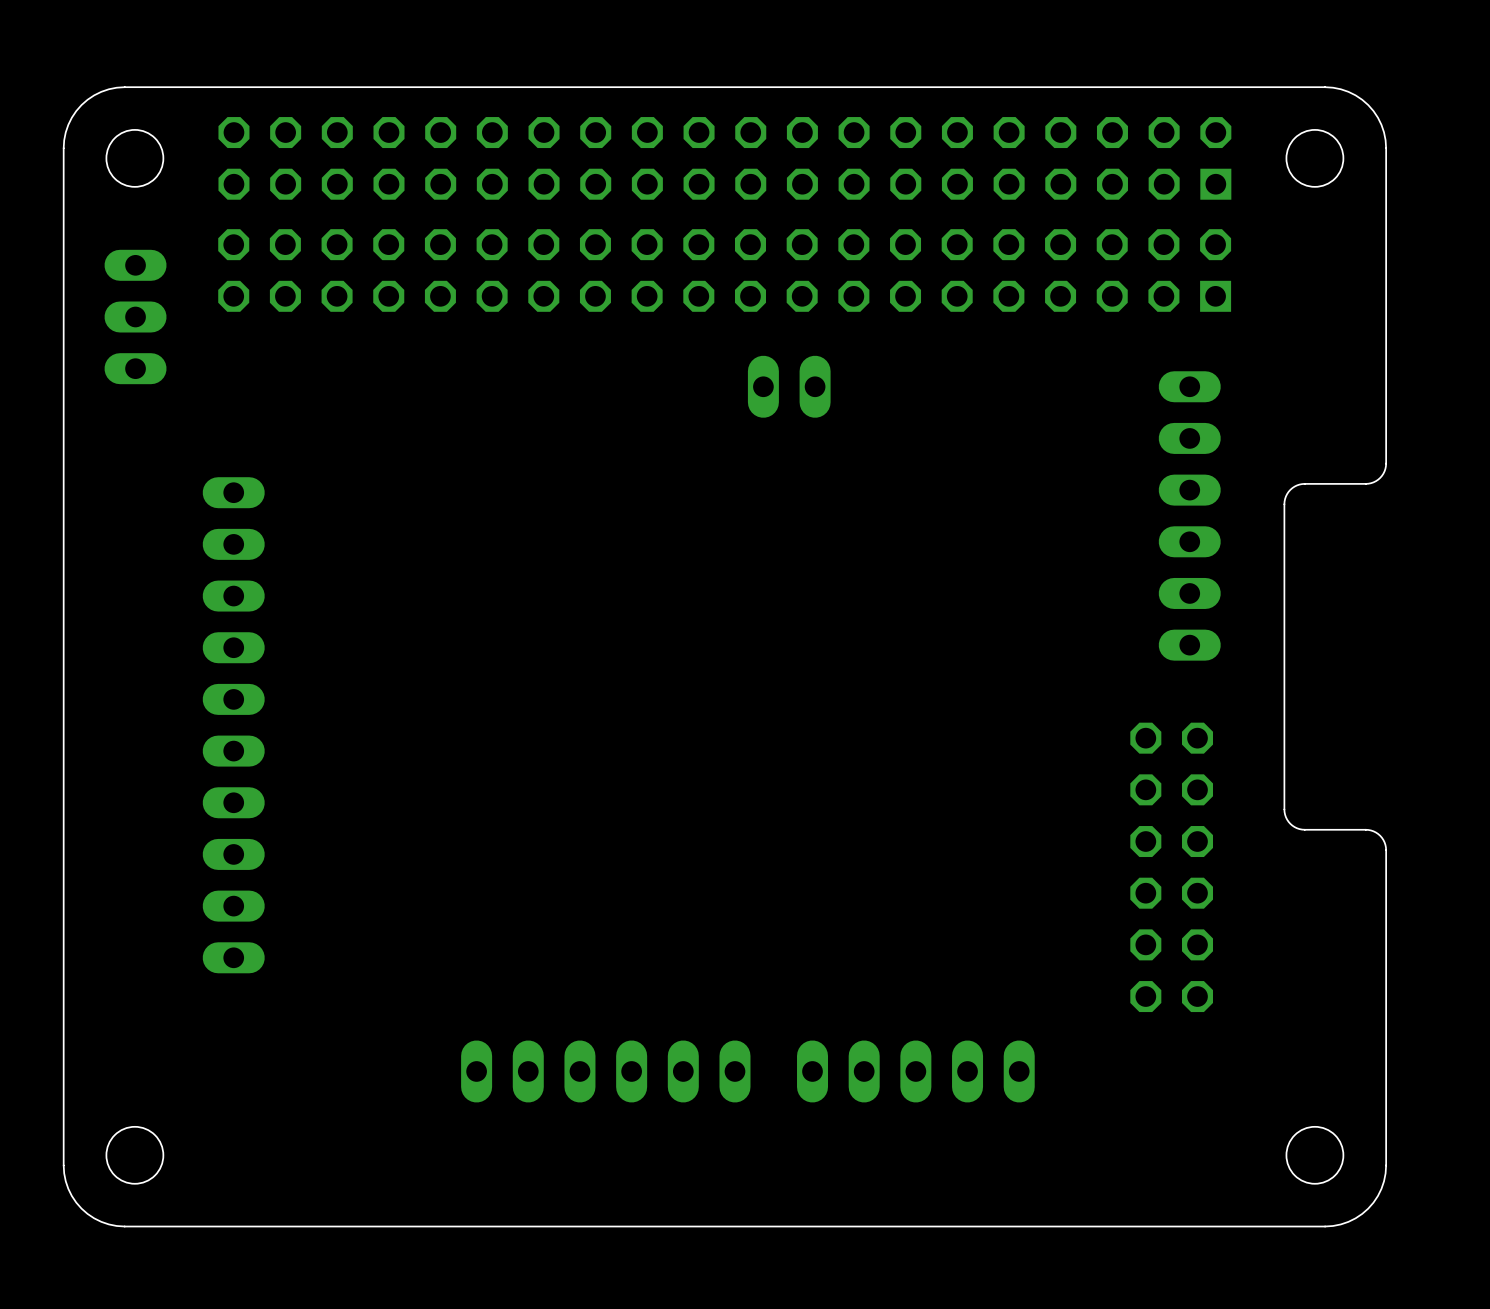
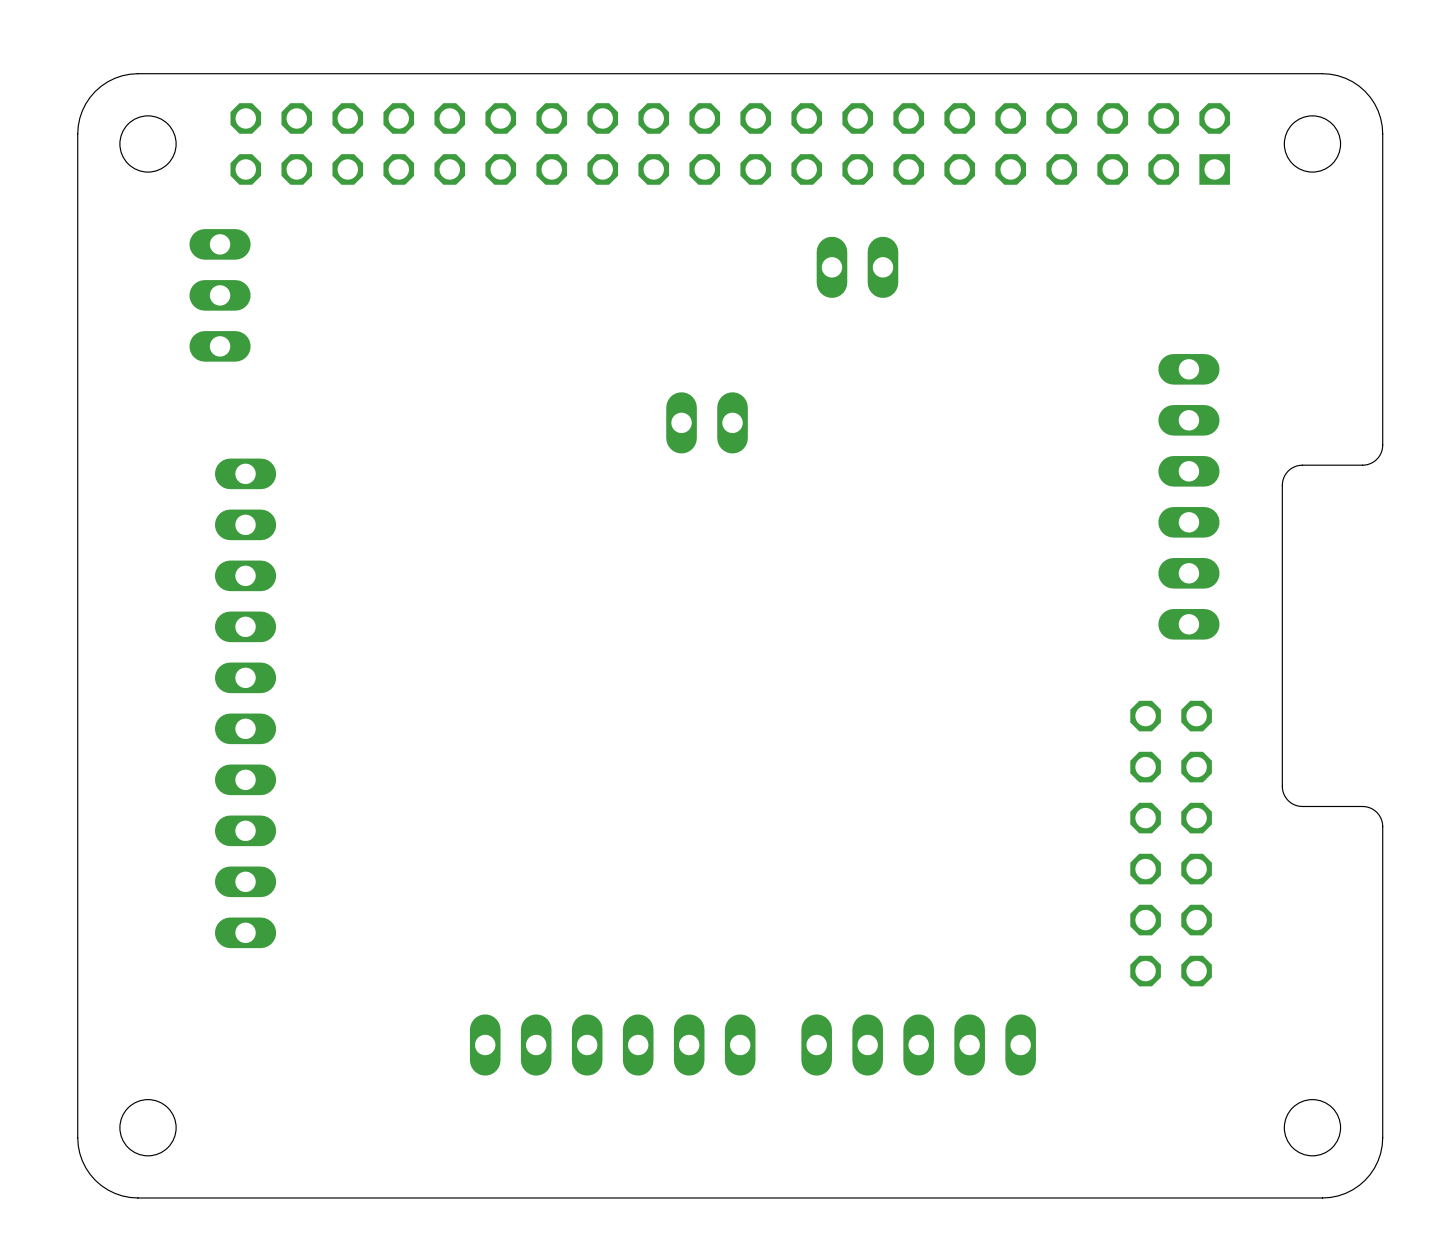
part: (724, 270) -> none
part: none -> (857, 267)
part position: (135, 316) -> (220, 295)
part: (789, 386) -> none
part: none -> (707, 422)

